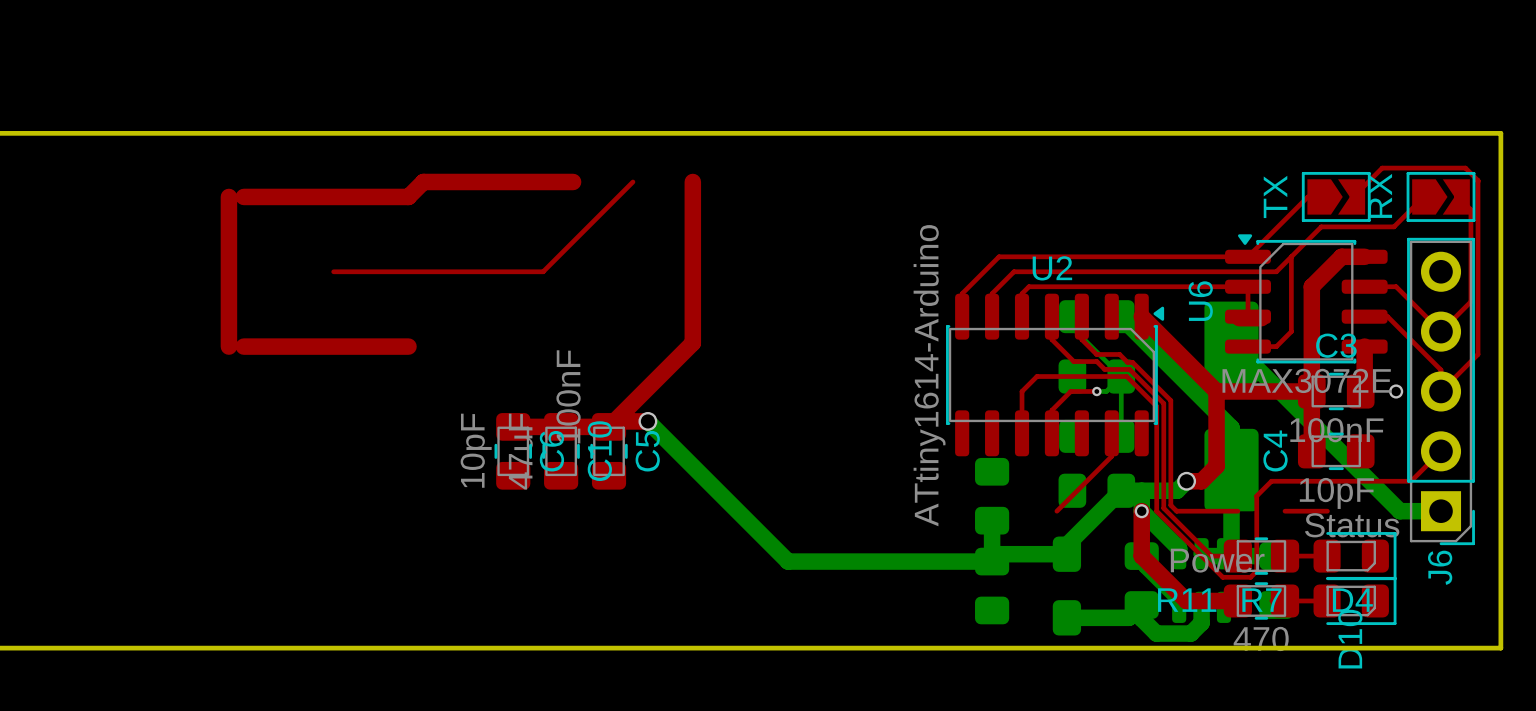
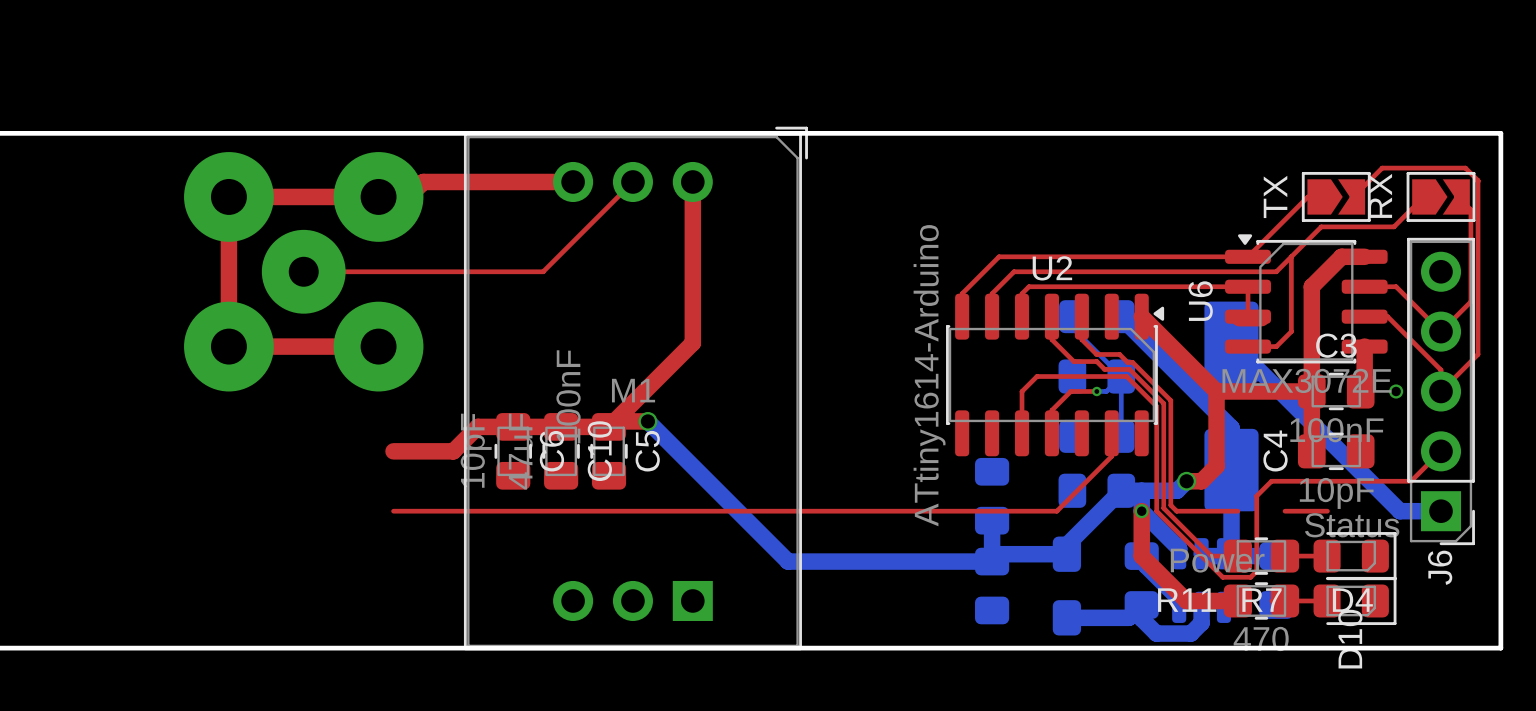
part: none -> (303, 271)
M1: none -> (635, 388)
top track: none -> (513, 426) (477, 426) (453, 451) (393, 451)
top track: none -> (393, 511) (1056, 511)

